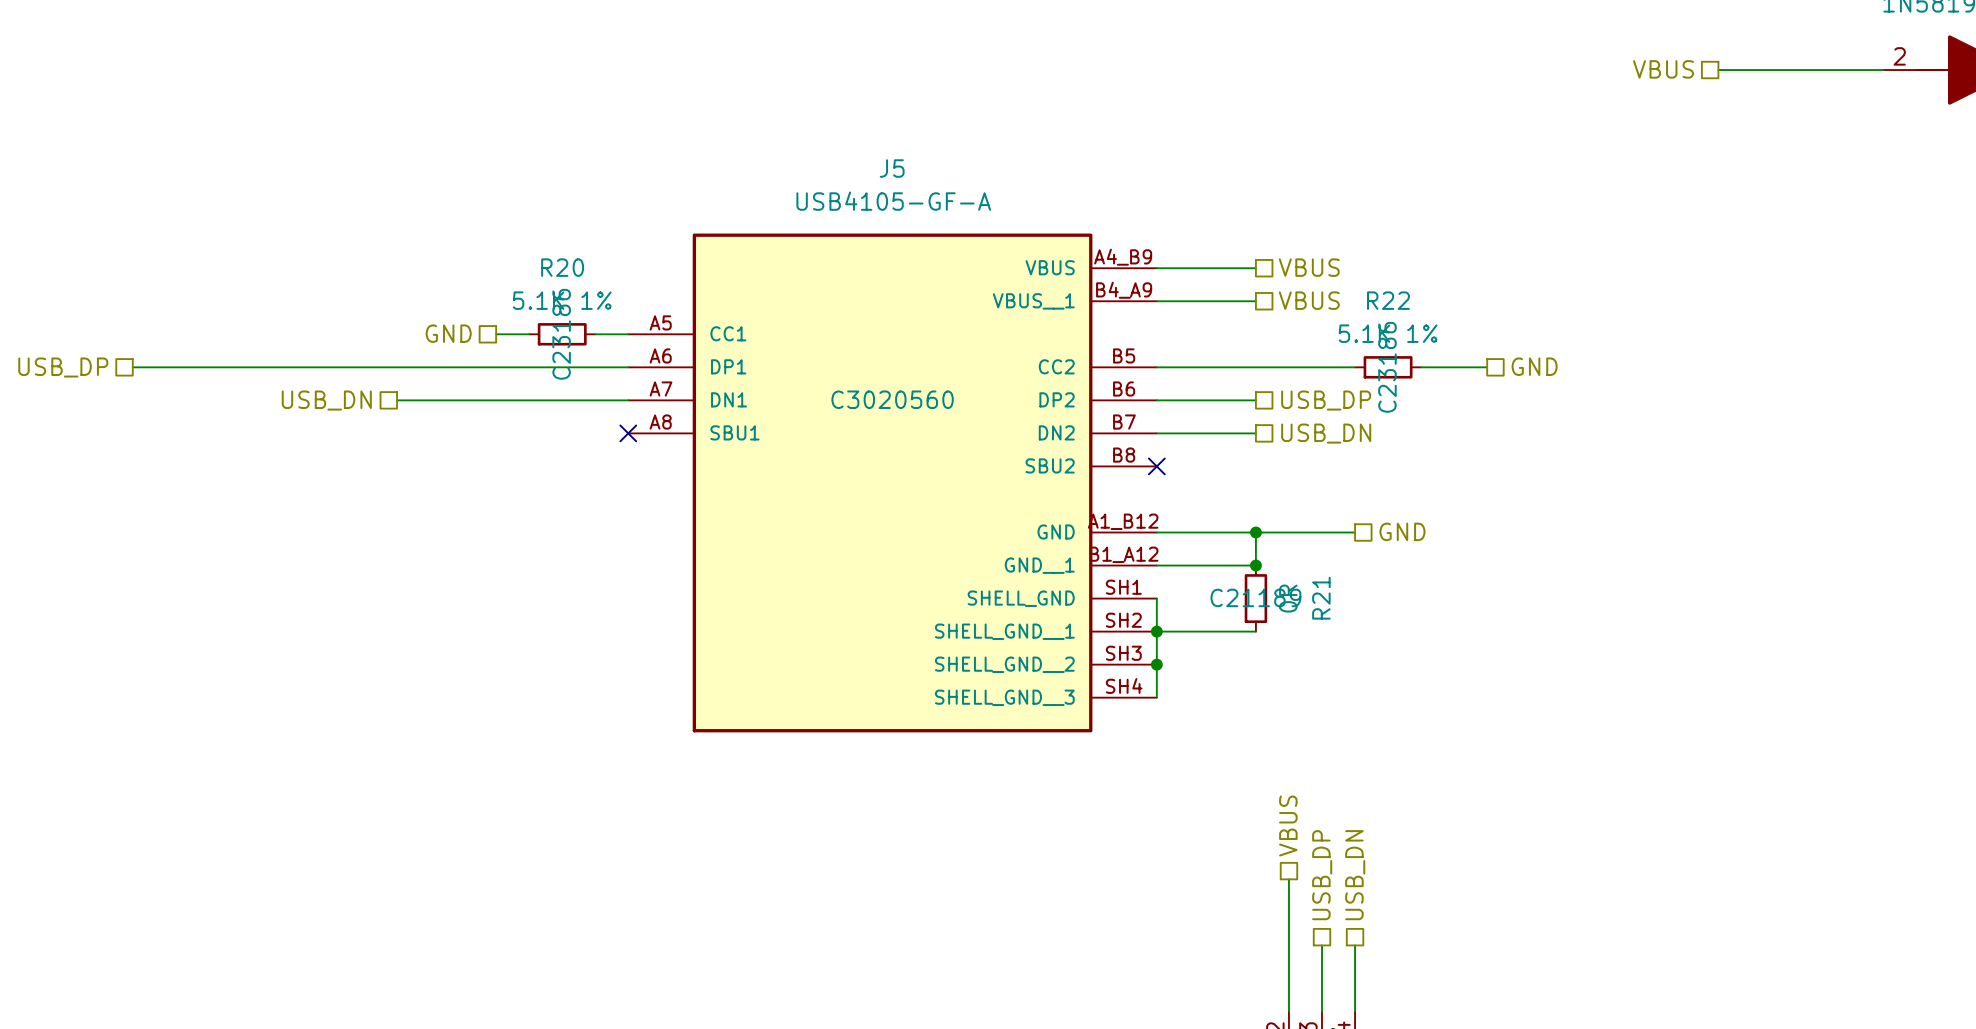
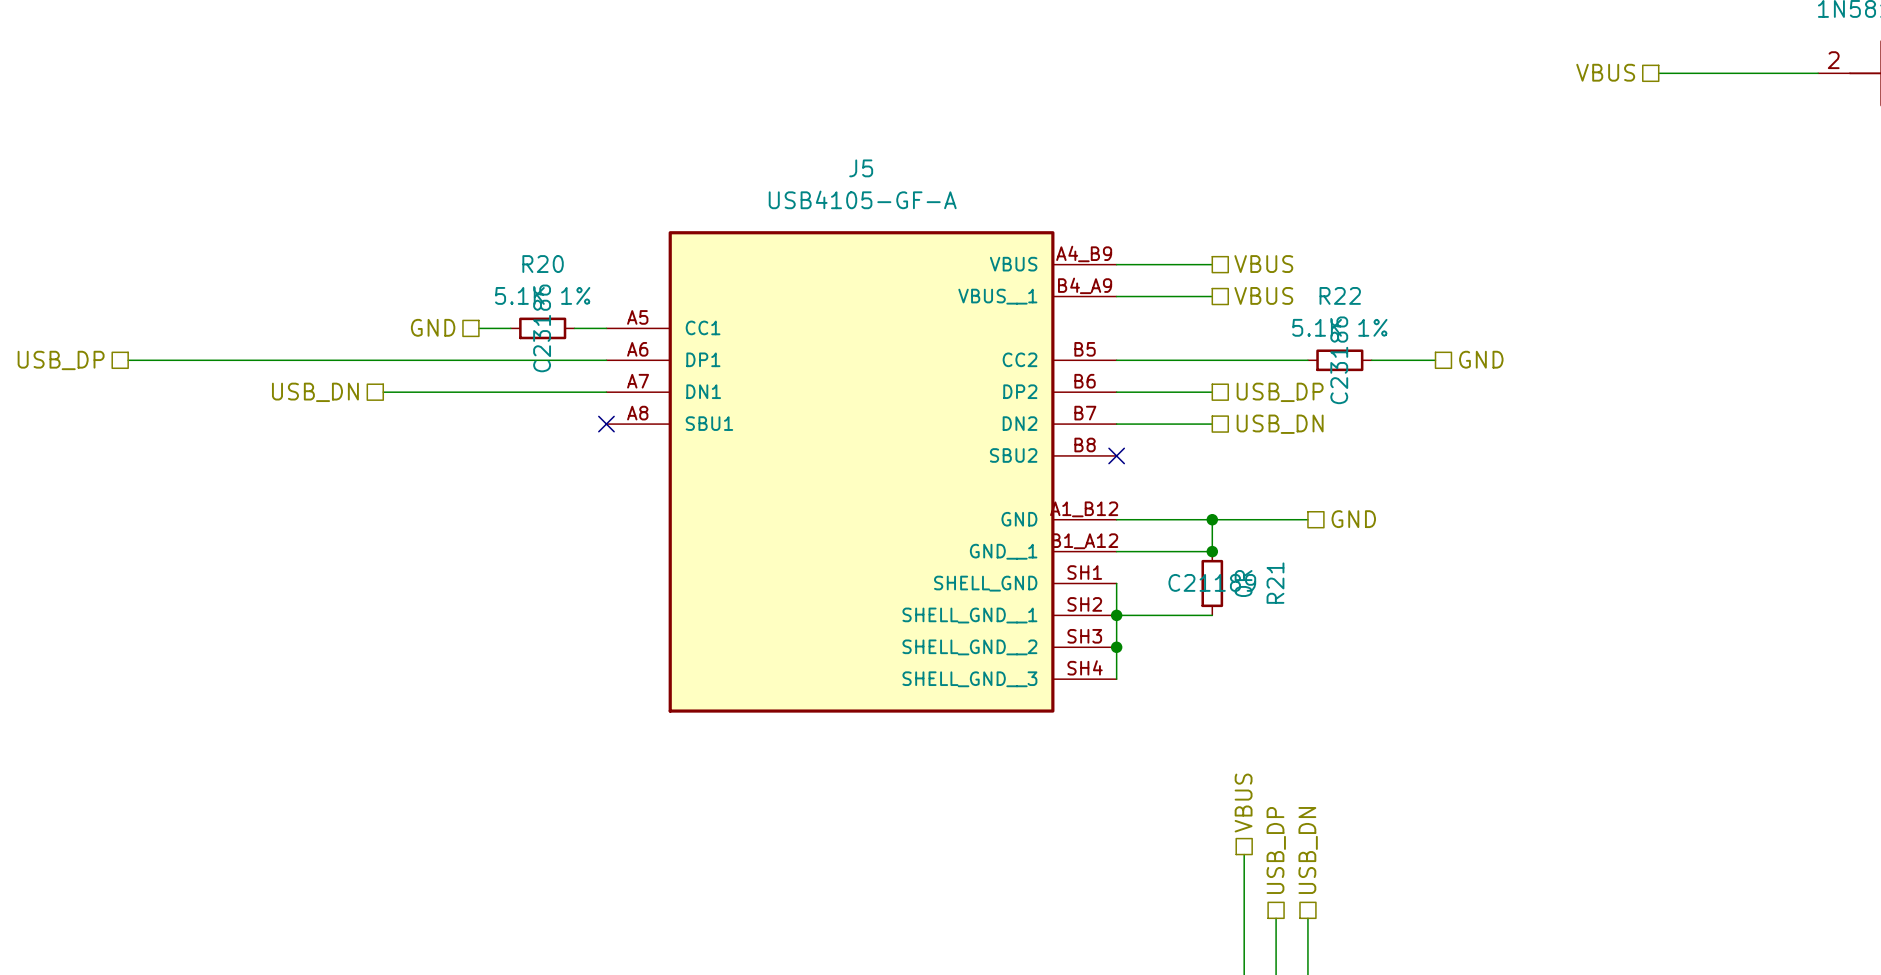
J5 text: C3020560 (892, 399) -> none

